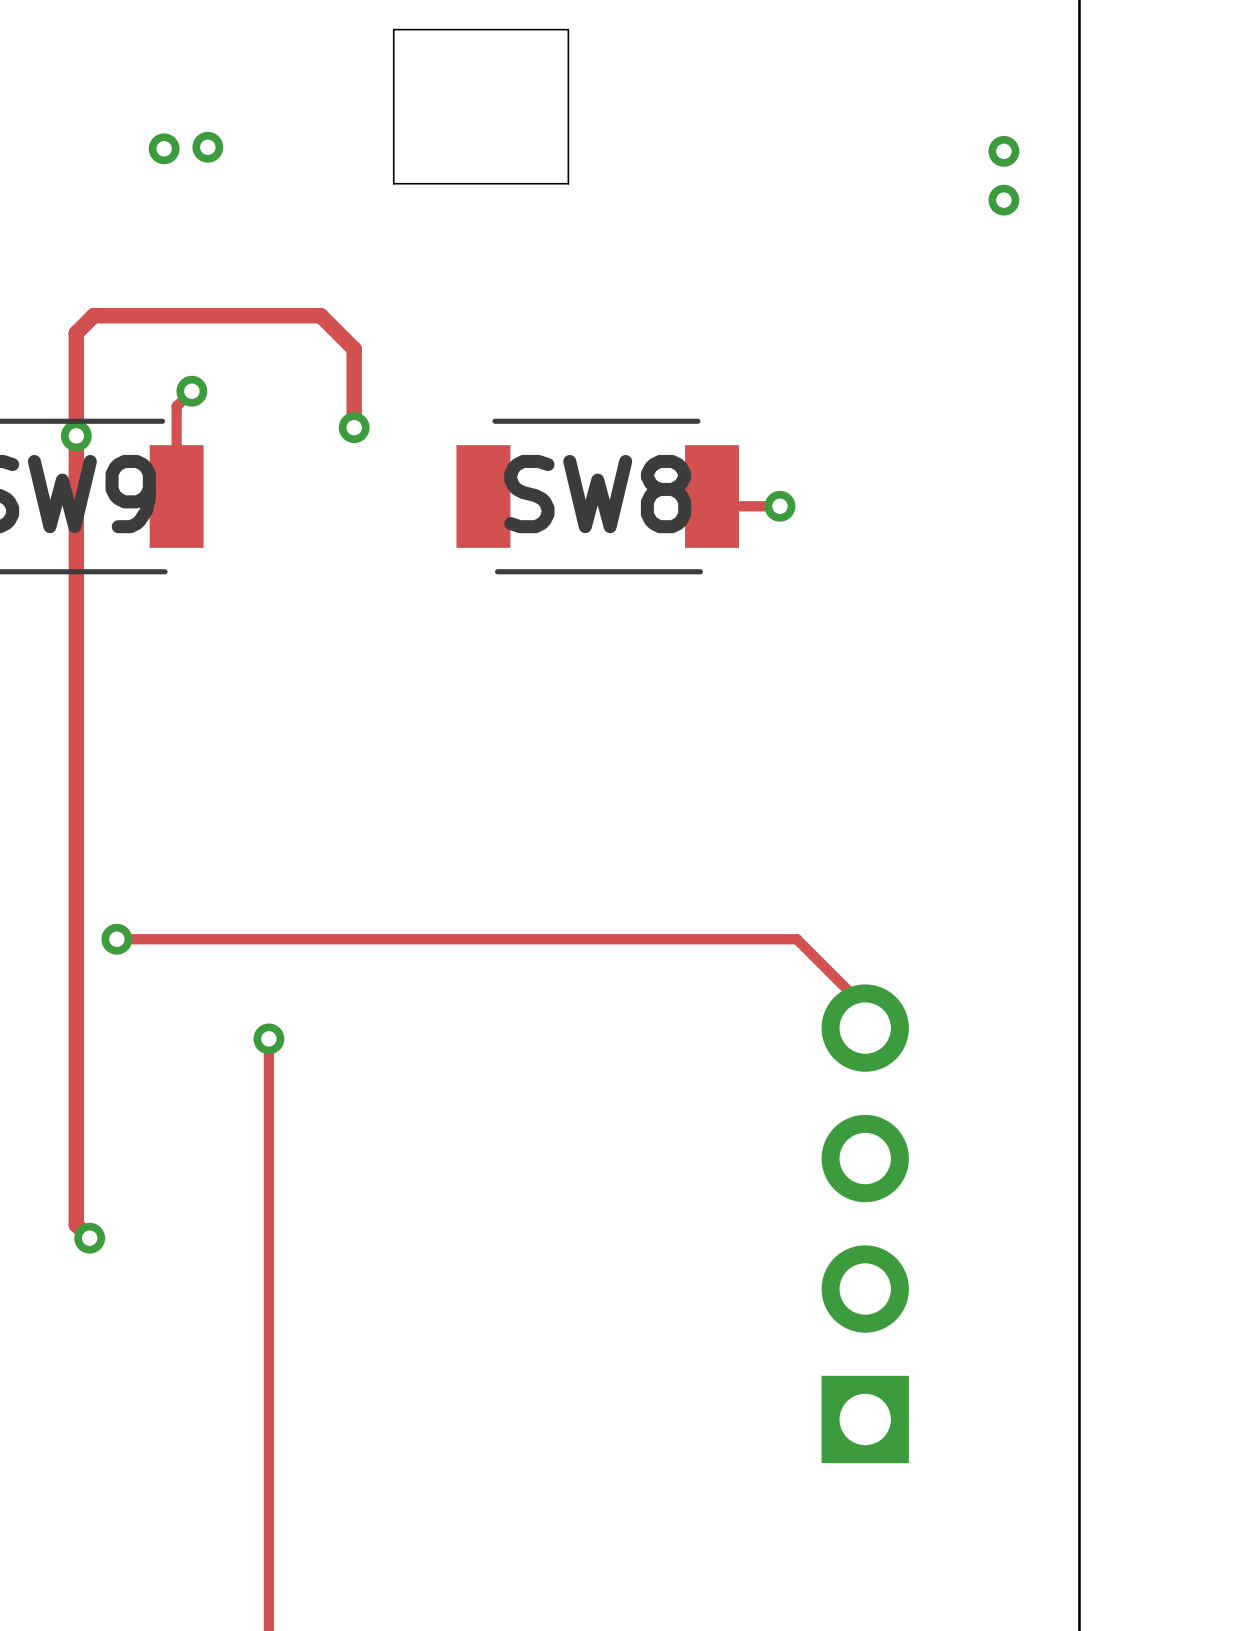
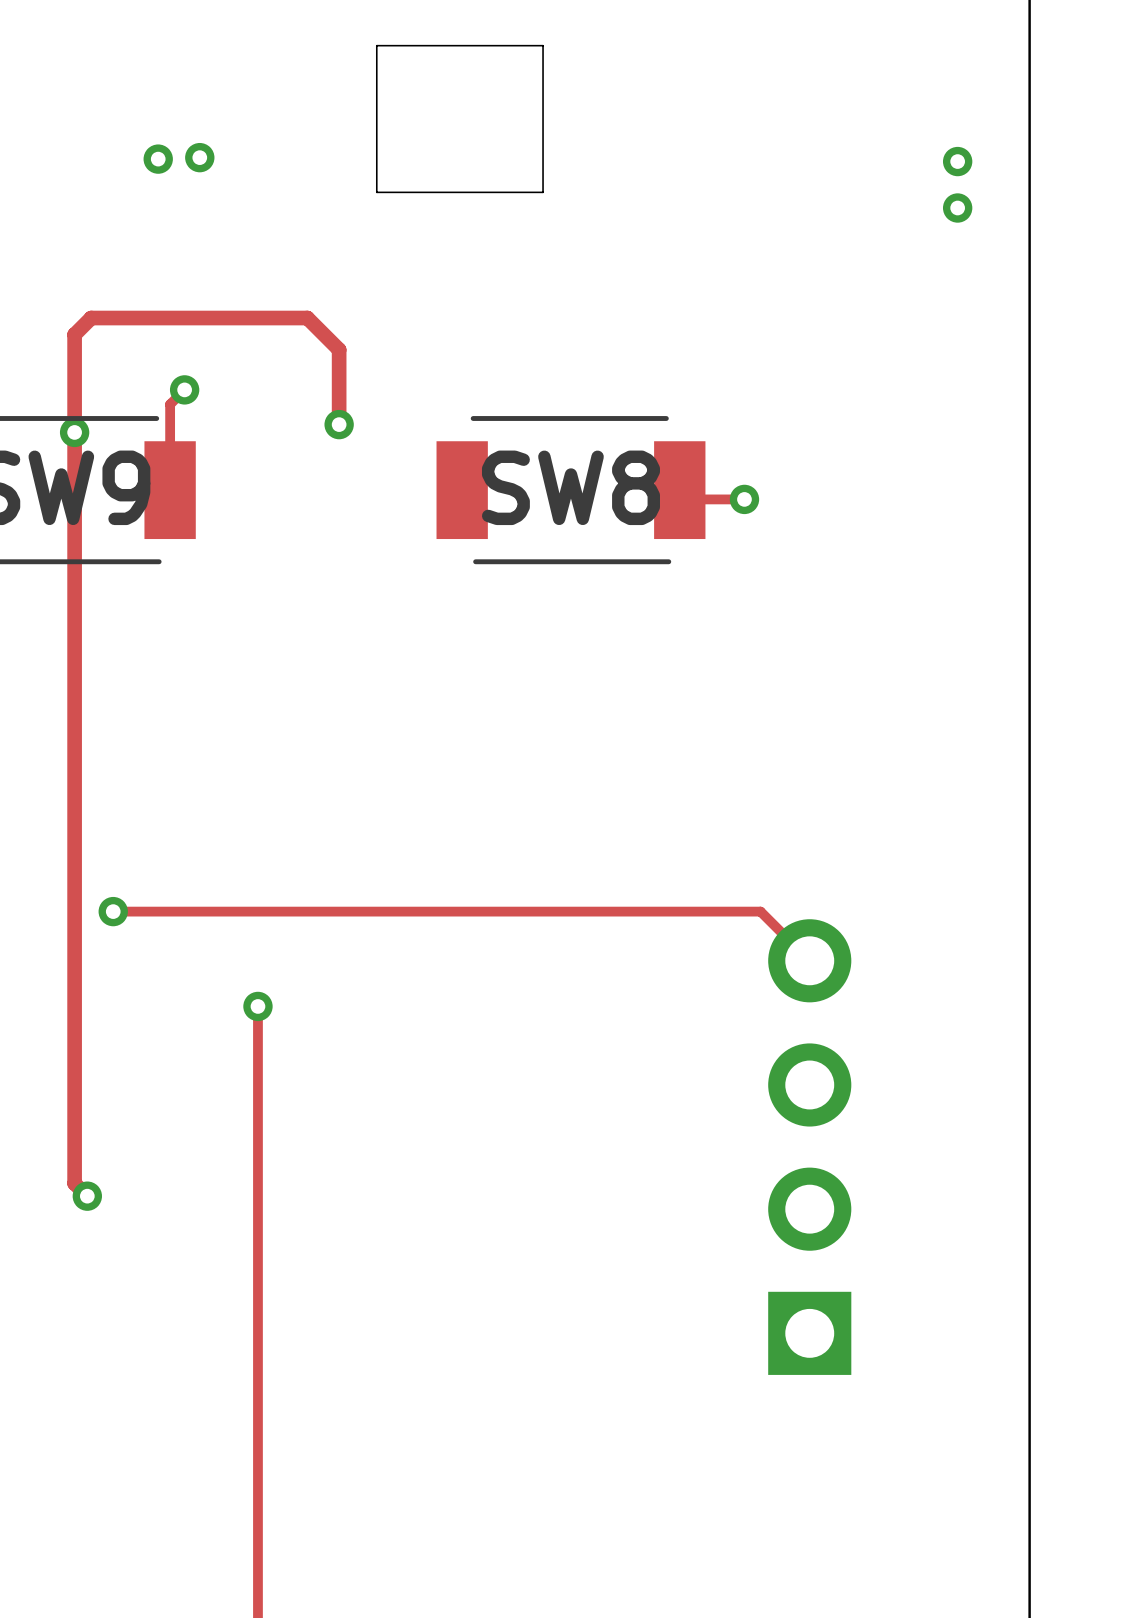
part position: (865, 1223) -> (809, 1147)

